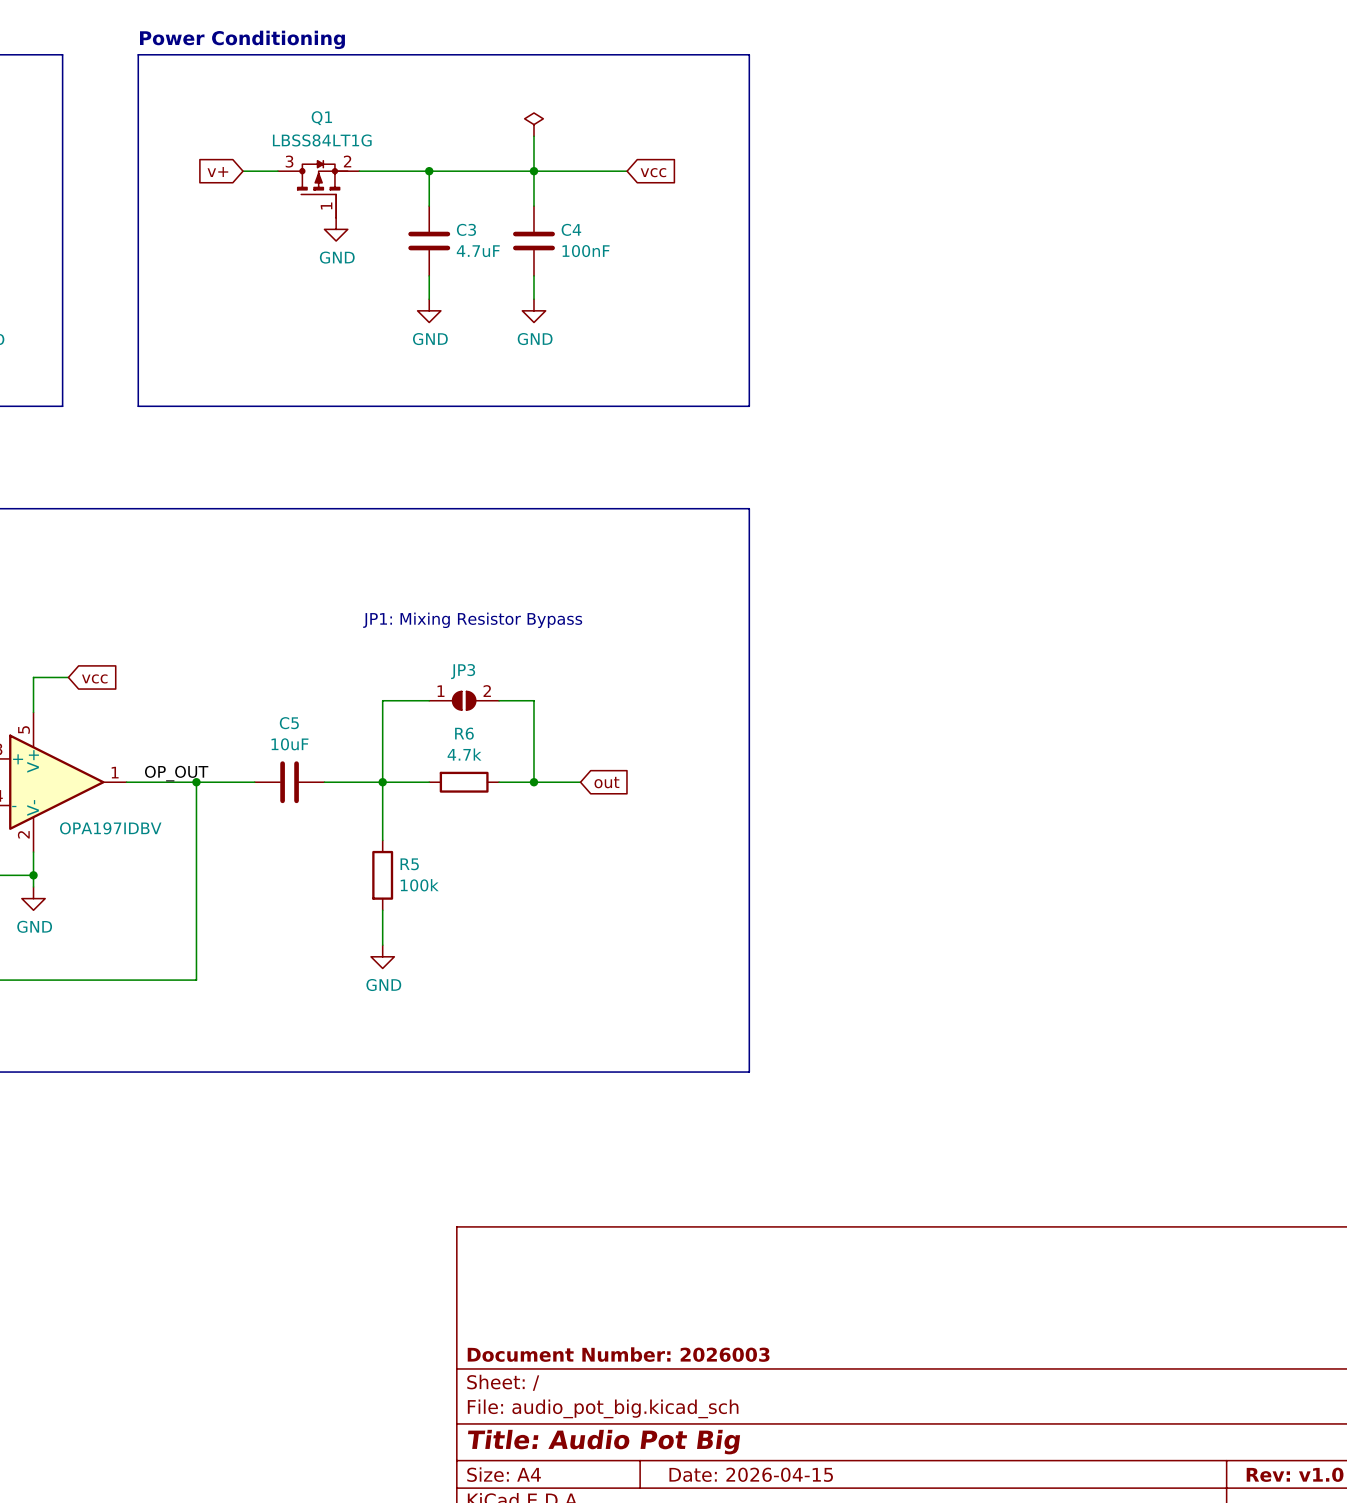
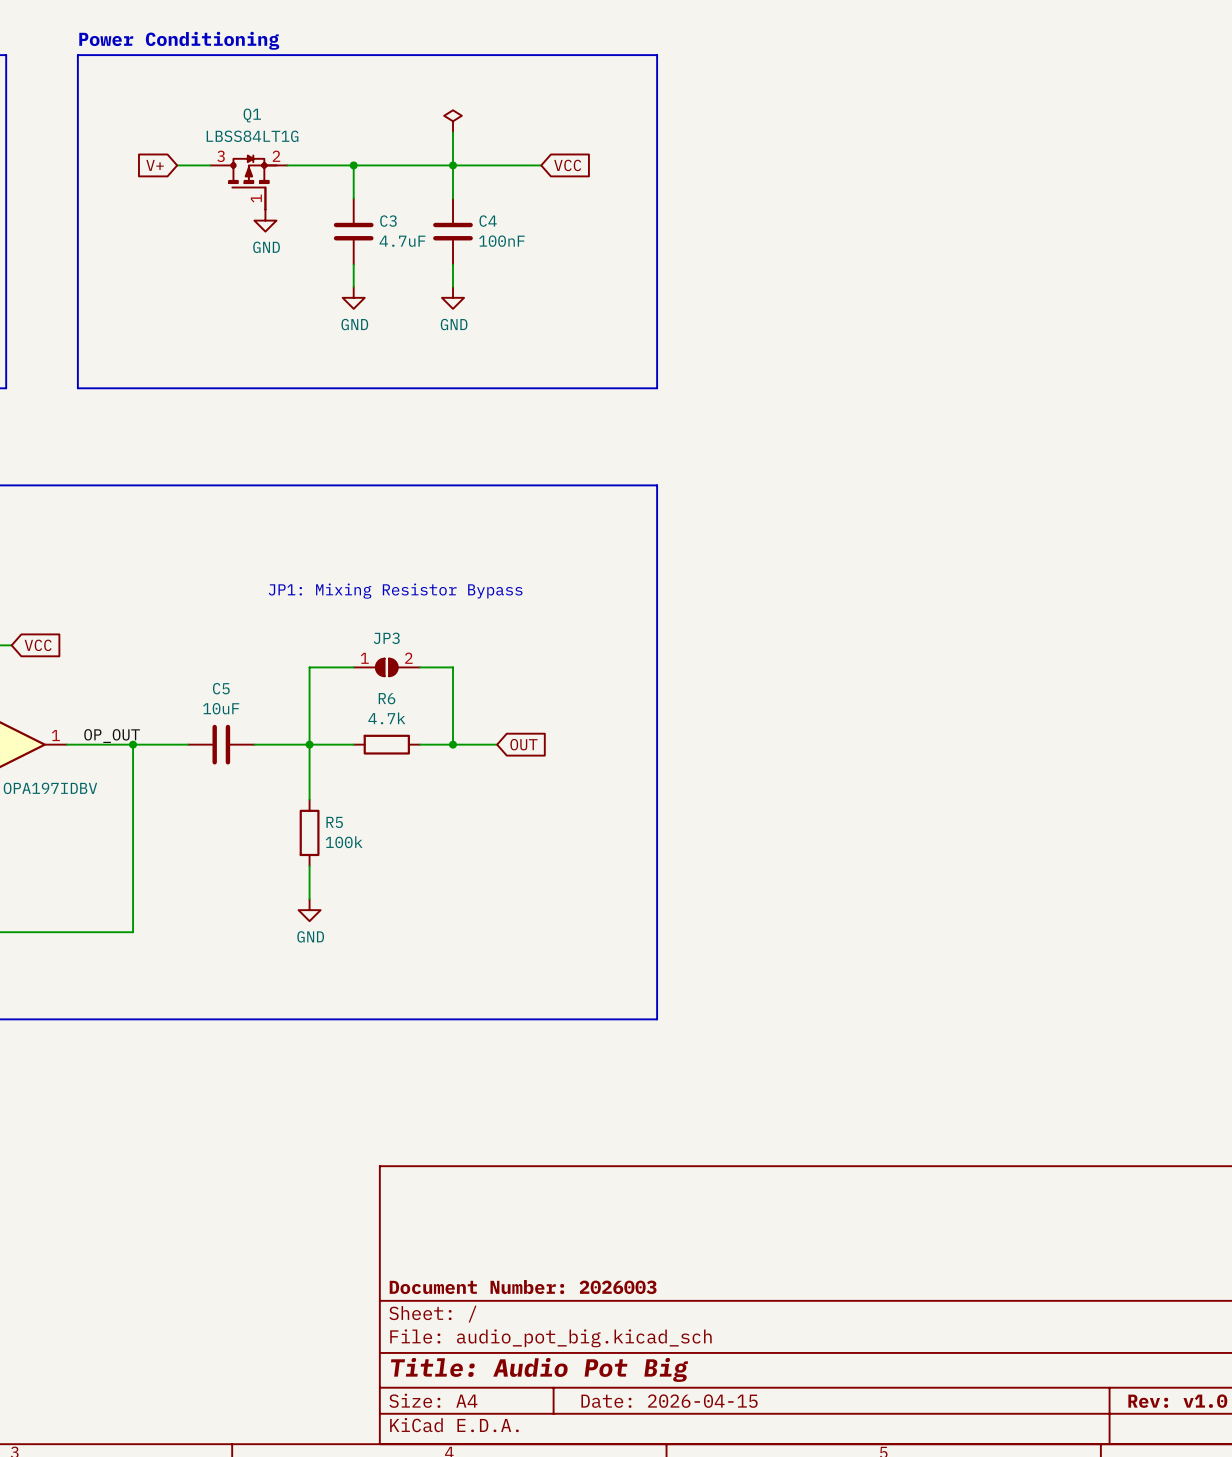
global label: v+ (217, 172) -> V+ (155, 165)
global label: vcc (653, 172) -> VCC (567, 165)
global label: vcc (94, 678) -> VCC (38, 645)
global label: out (606, 782) -> OUT (524, 744)

